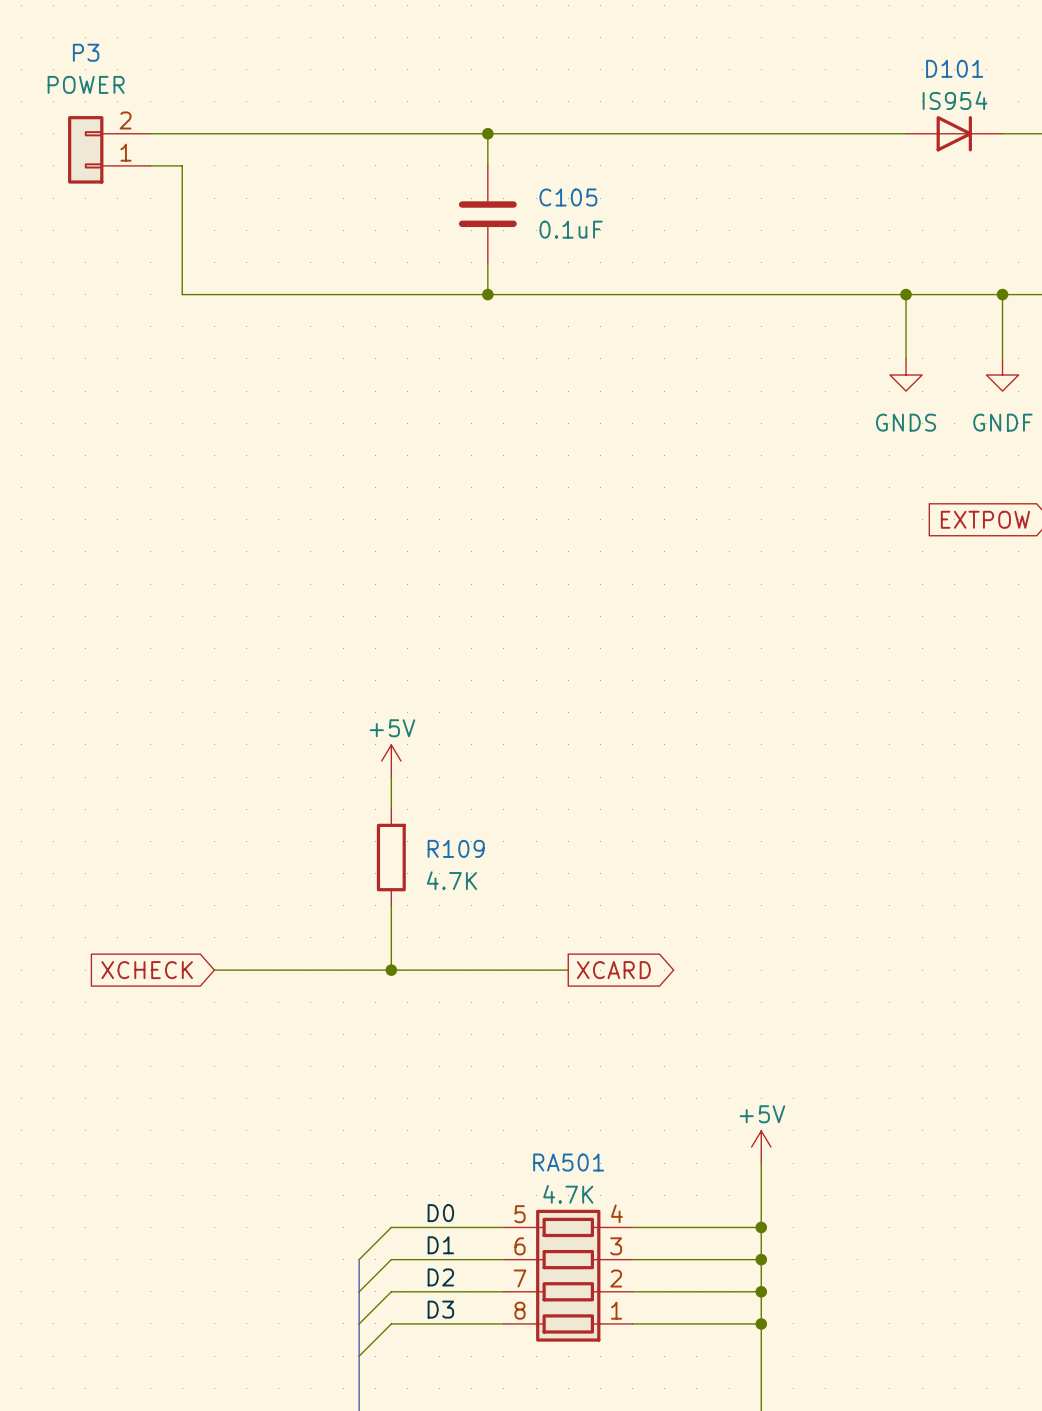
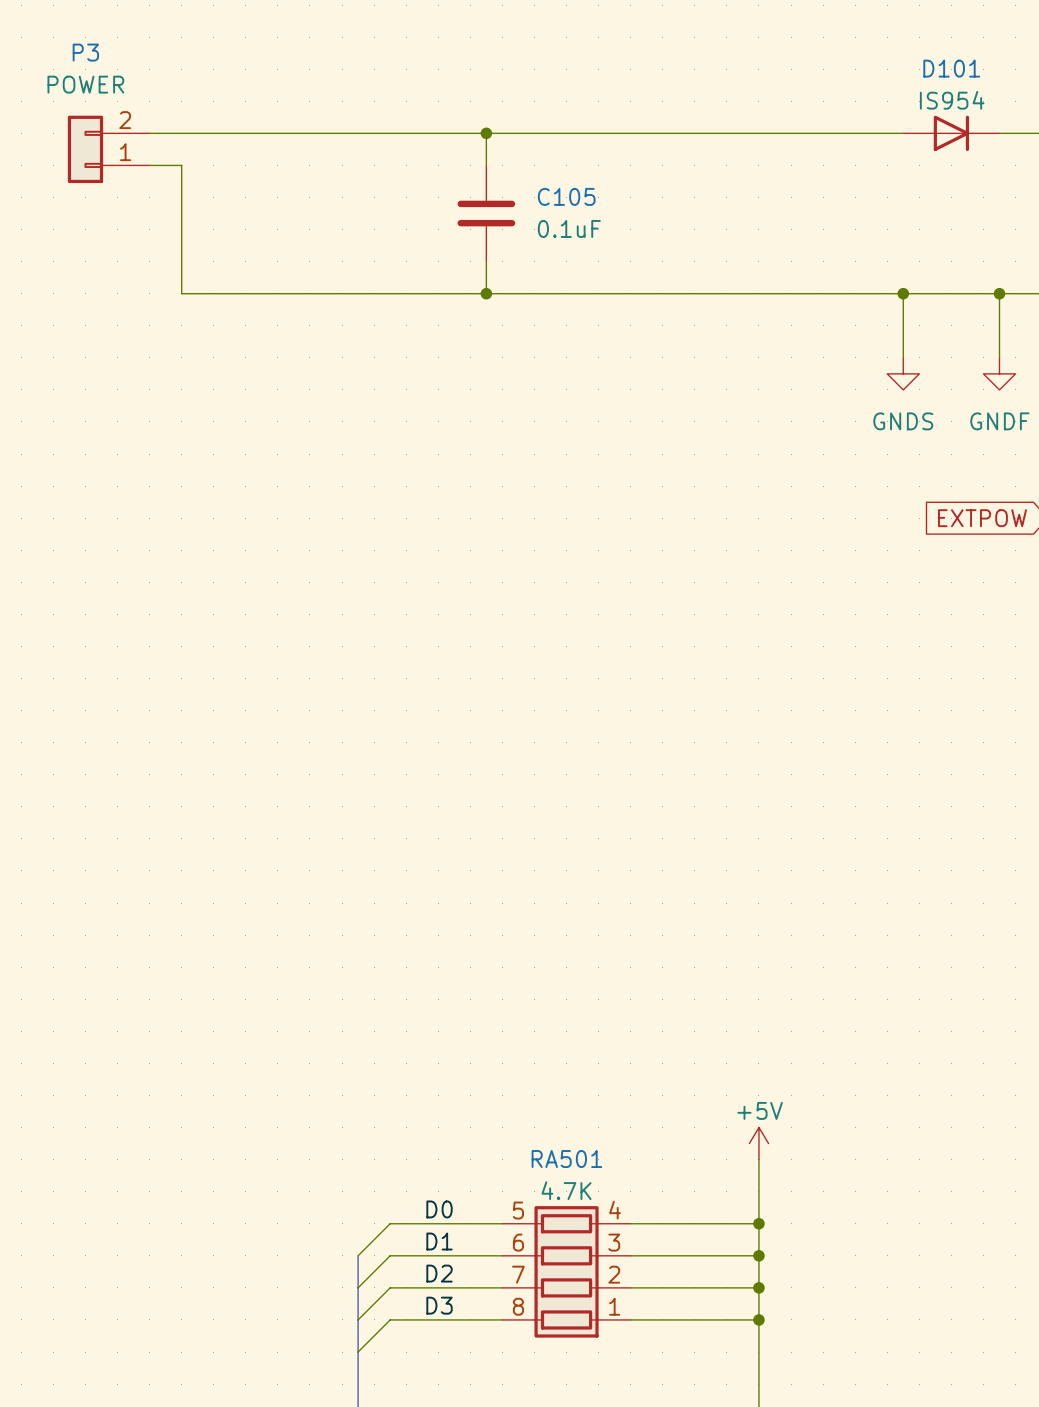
power symbol: +5V (391, 761) -> none
wire: (391, 777) (391, 809) -> none
R109: 4.7K (391, 857) -> none
wire: (391, 905) (391, 970) -> none
global label: XCHECK (147, 970) -> none
wire: (214, 970) (568, 970) -> none
junction: (391, 970) -> none
global label: XCARD (613, 970) -> none

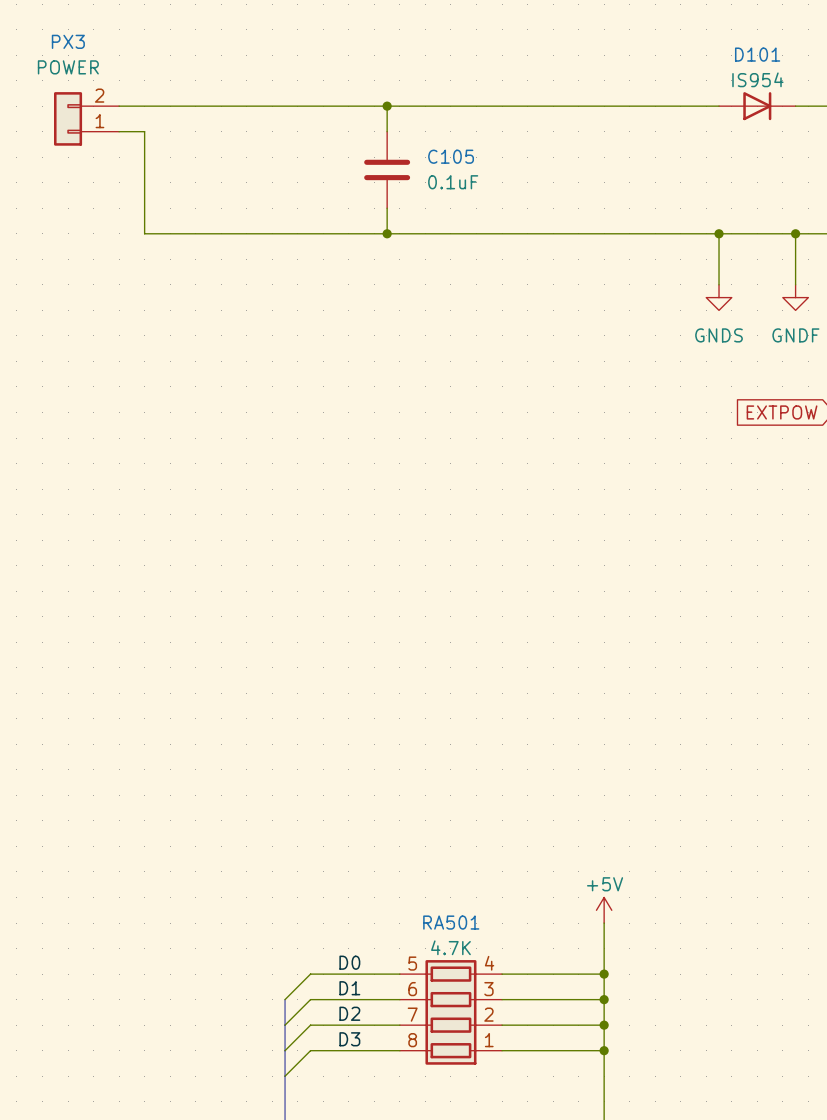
P3 name: P3 (85, 52) -> PX3 (68, 41)

